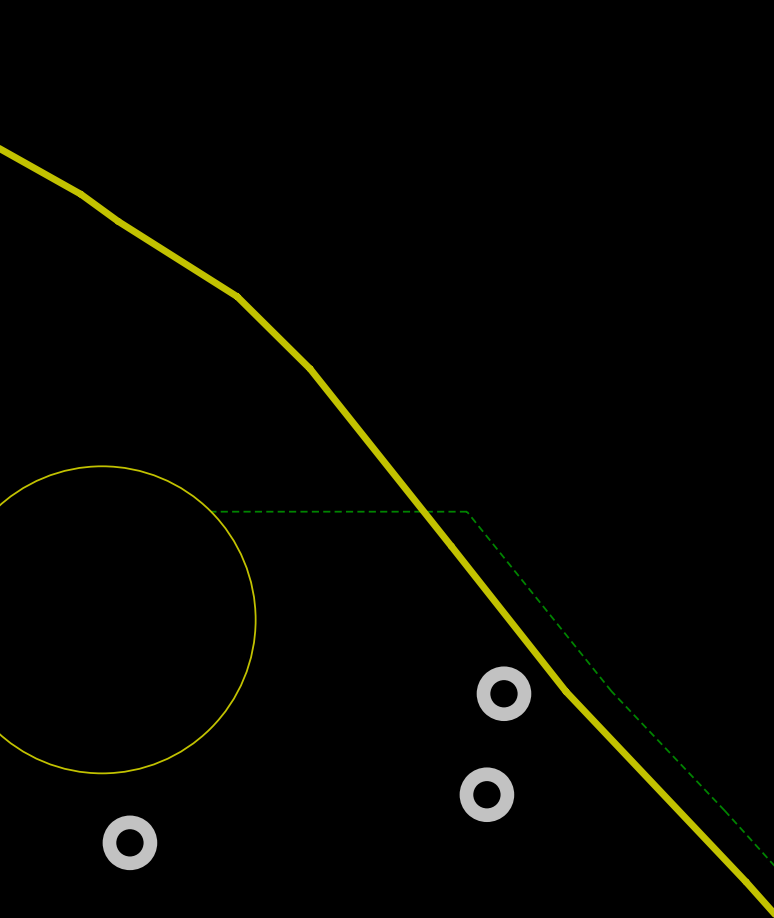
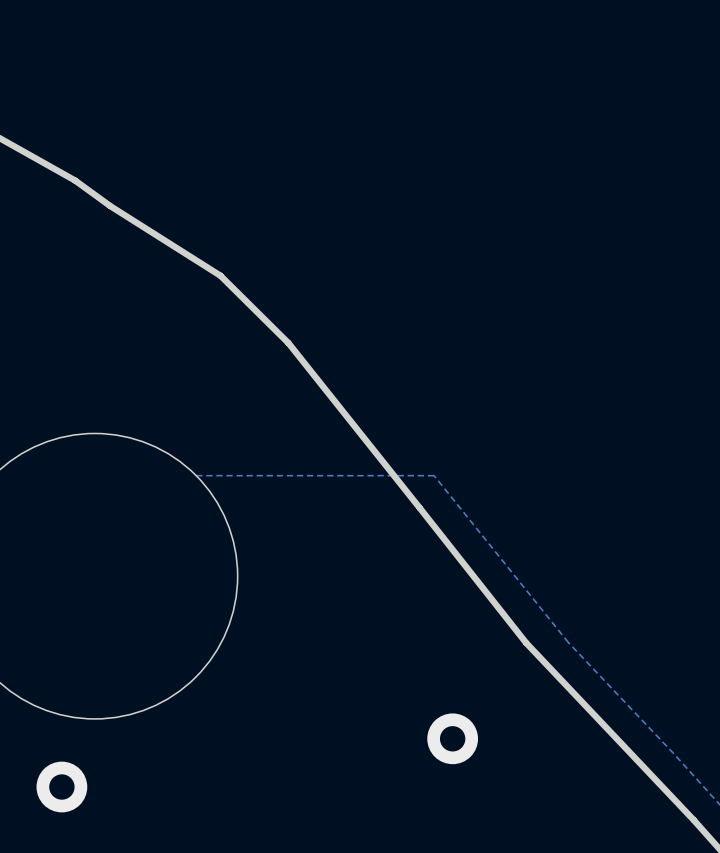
via: (503, 693) -> none
via position: (129, 842) -> (61, 787)

